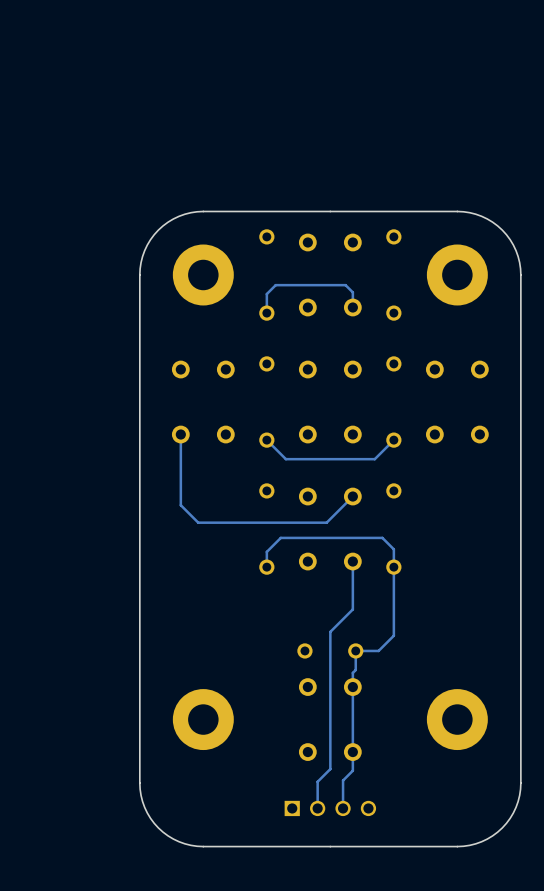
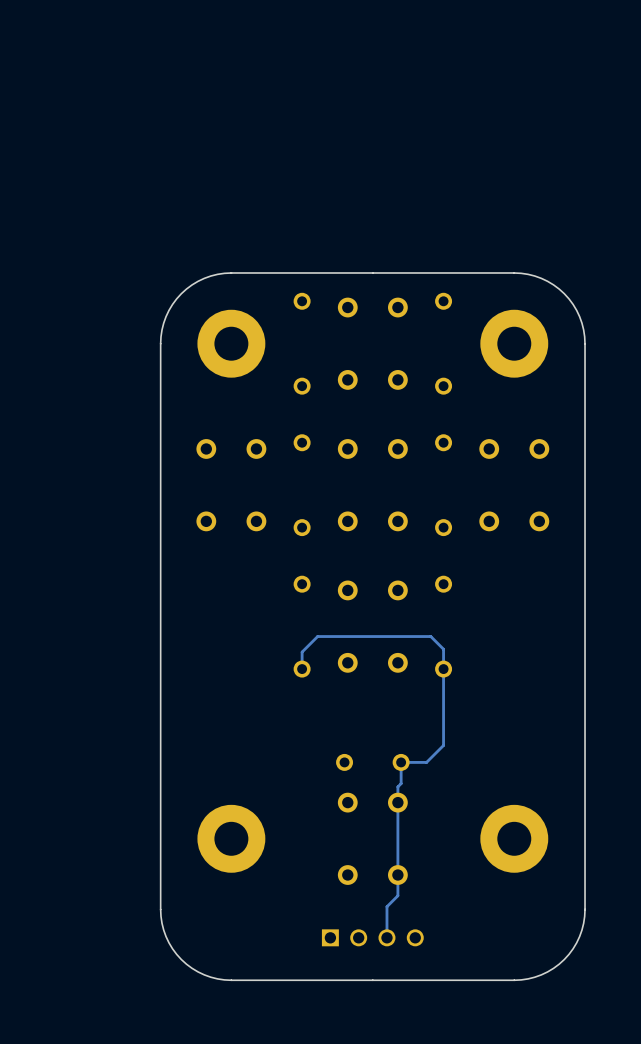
track: (352, 307) (352, 292) (345, 285) (275, 285) (266, 294) (266, 313) -> none
track: (180, 434) (180, 505) (198, 522) (326, 522) (352, 496) -> none
track: (393, 440) (374, 459) (285, 459) (266, 440) -> none
track: (352, 561) (352, 609) (330, 631) (330, 769) (317, 781) (317, 808) -> none

